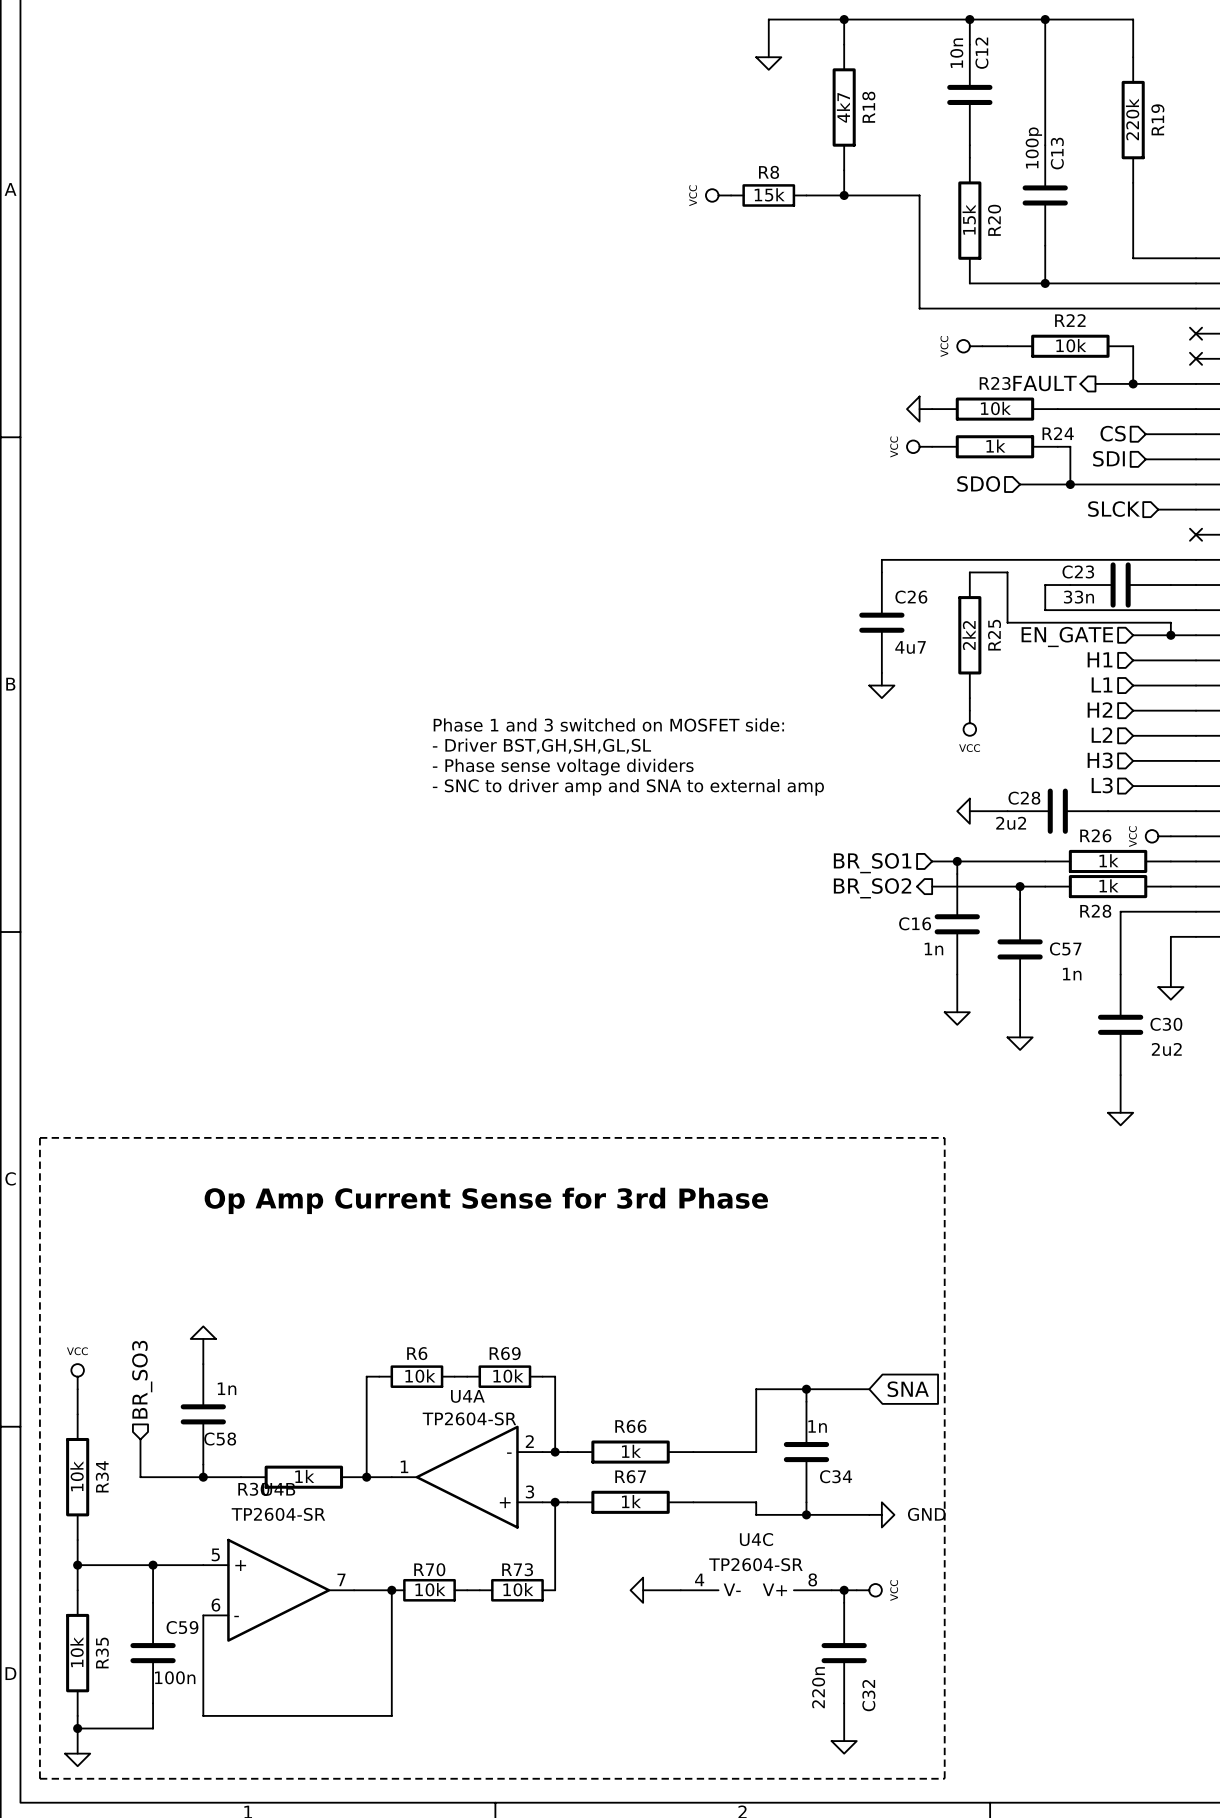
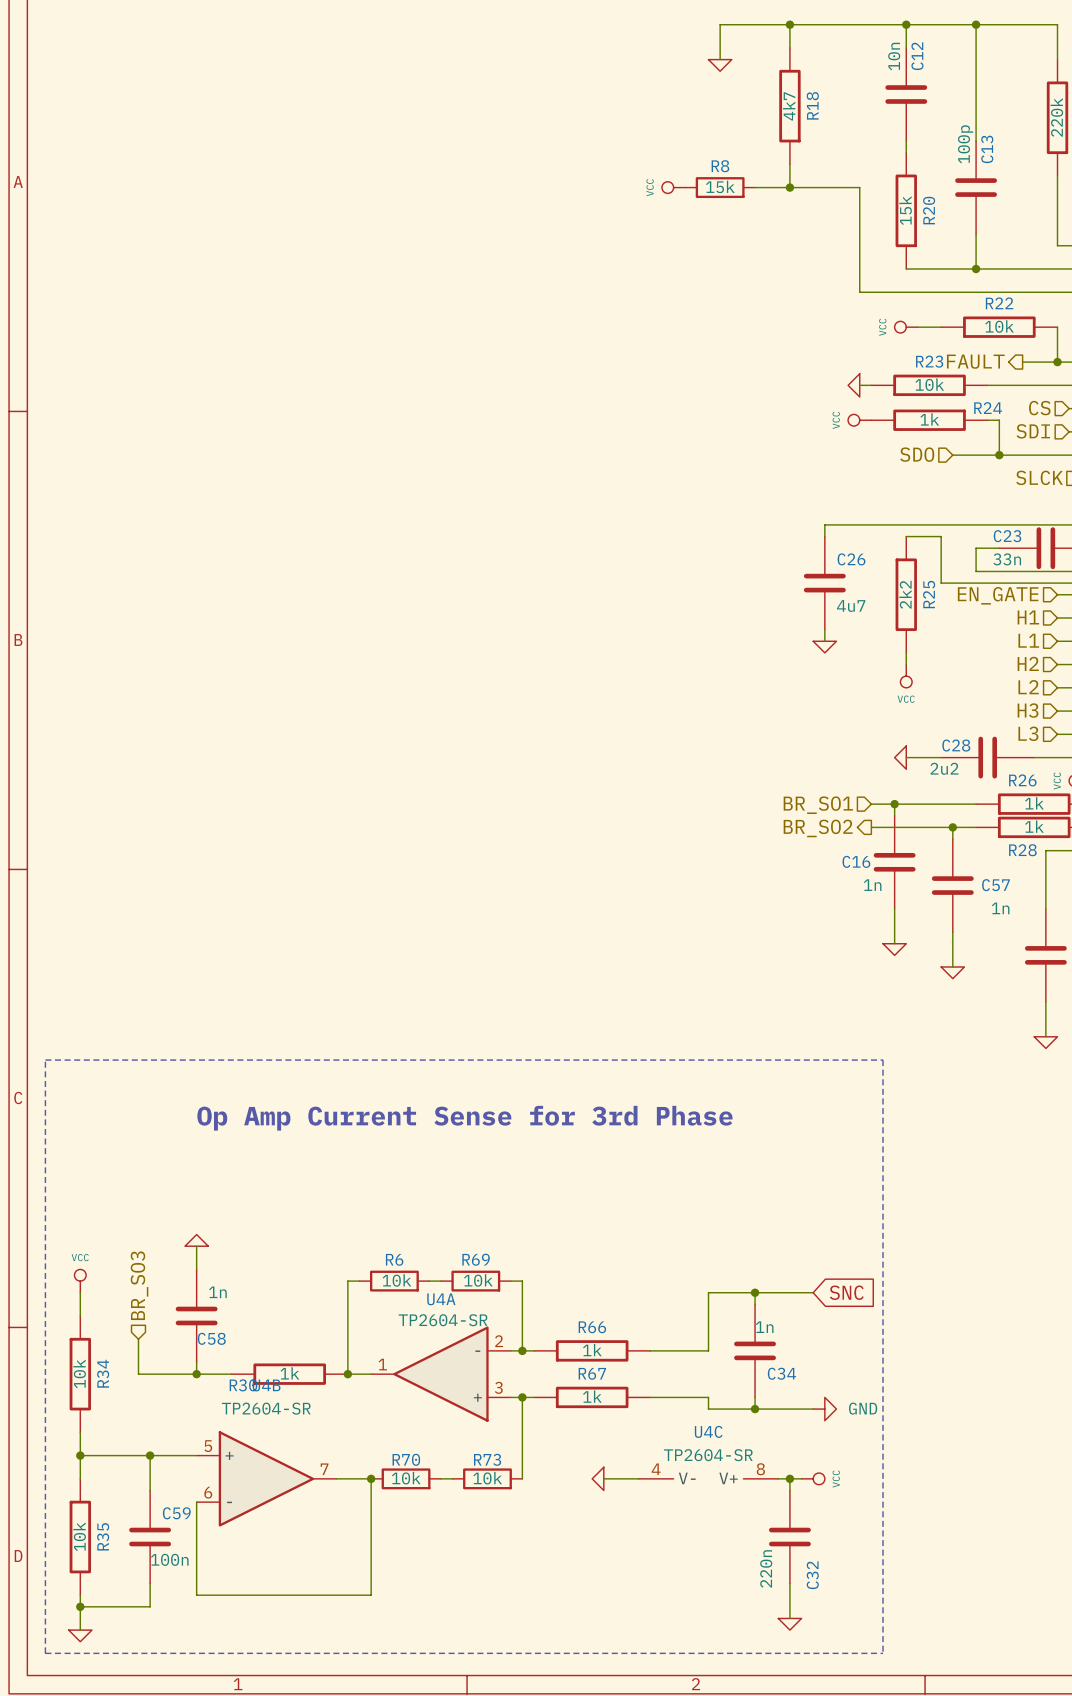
text: Phase 1 and 3 switched on MOSFET side: (608, 724) -> none
text: - Driver BST,GH,SH,GL,SL (541, 746) -> none
text: - Phase sense voltage dividers (563, 767) -> none
text: - SNC to driver amp and SNA to external amp (628, 787) -> none
global label: SNA (908, 1389) -> SNC (846, 1292)

